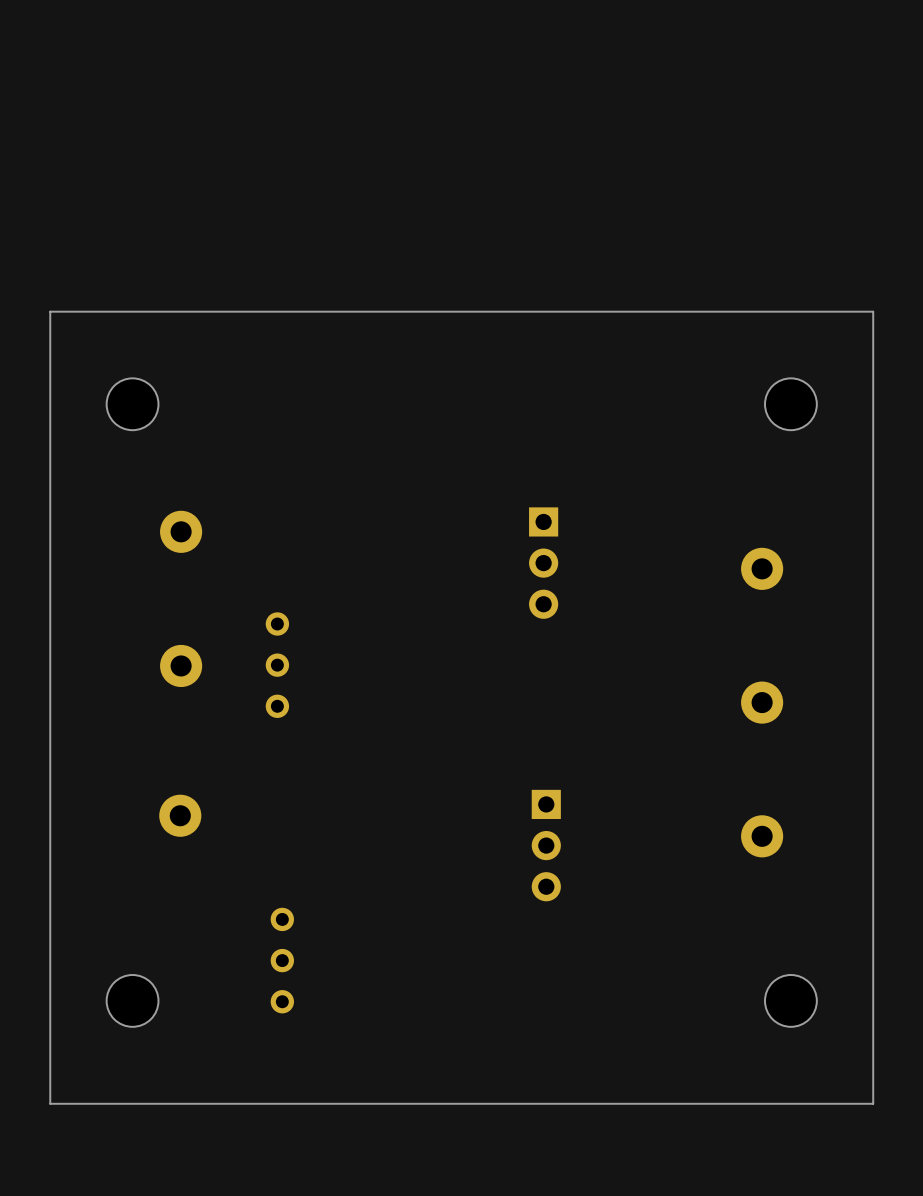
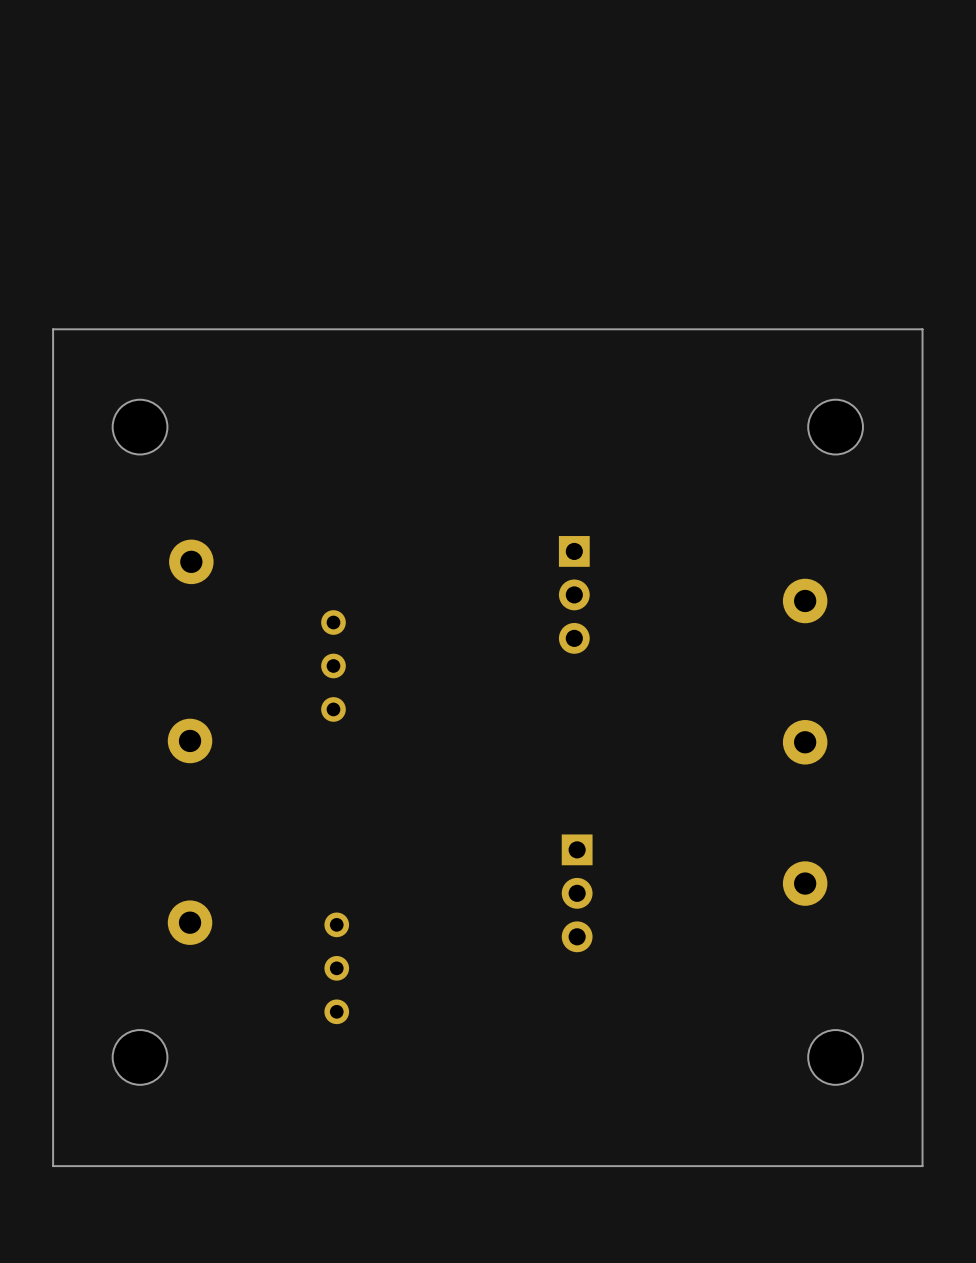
part position: (181, 665) -> (190, 740)
part position: (277, 665) -> (333, 665)
part: (180, 815) -> none
part: none -> (190, 922)
part position: (282, 960) -> (336, 968)

